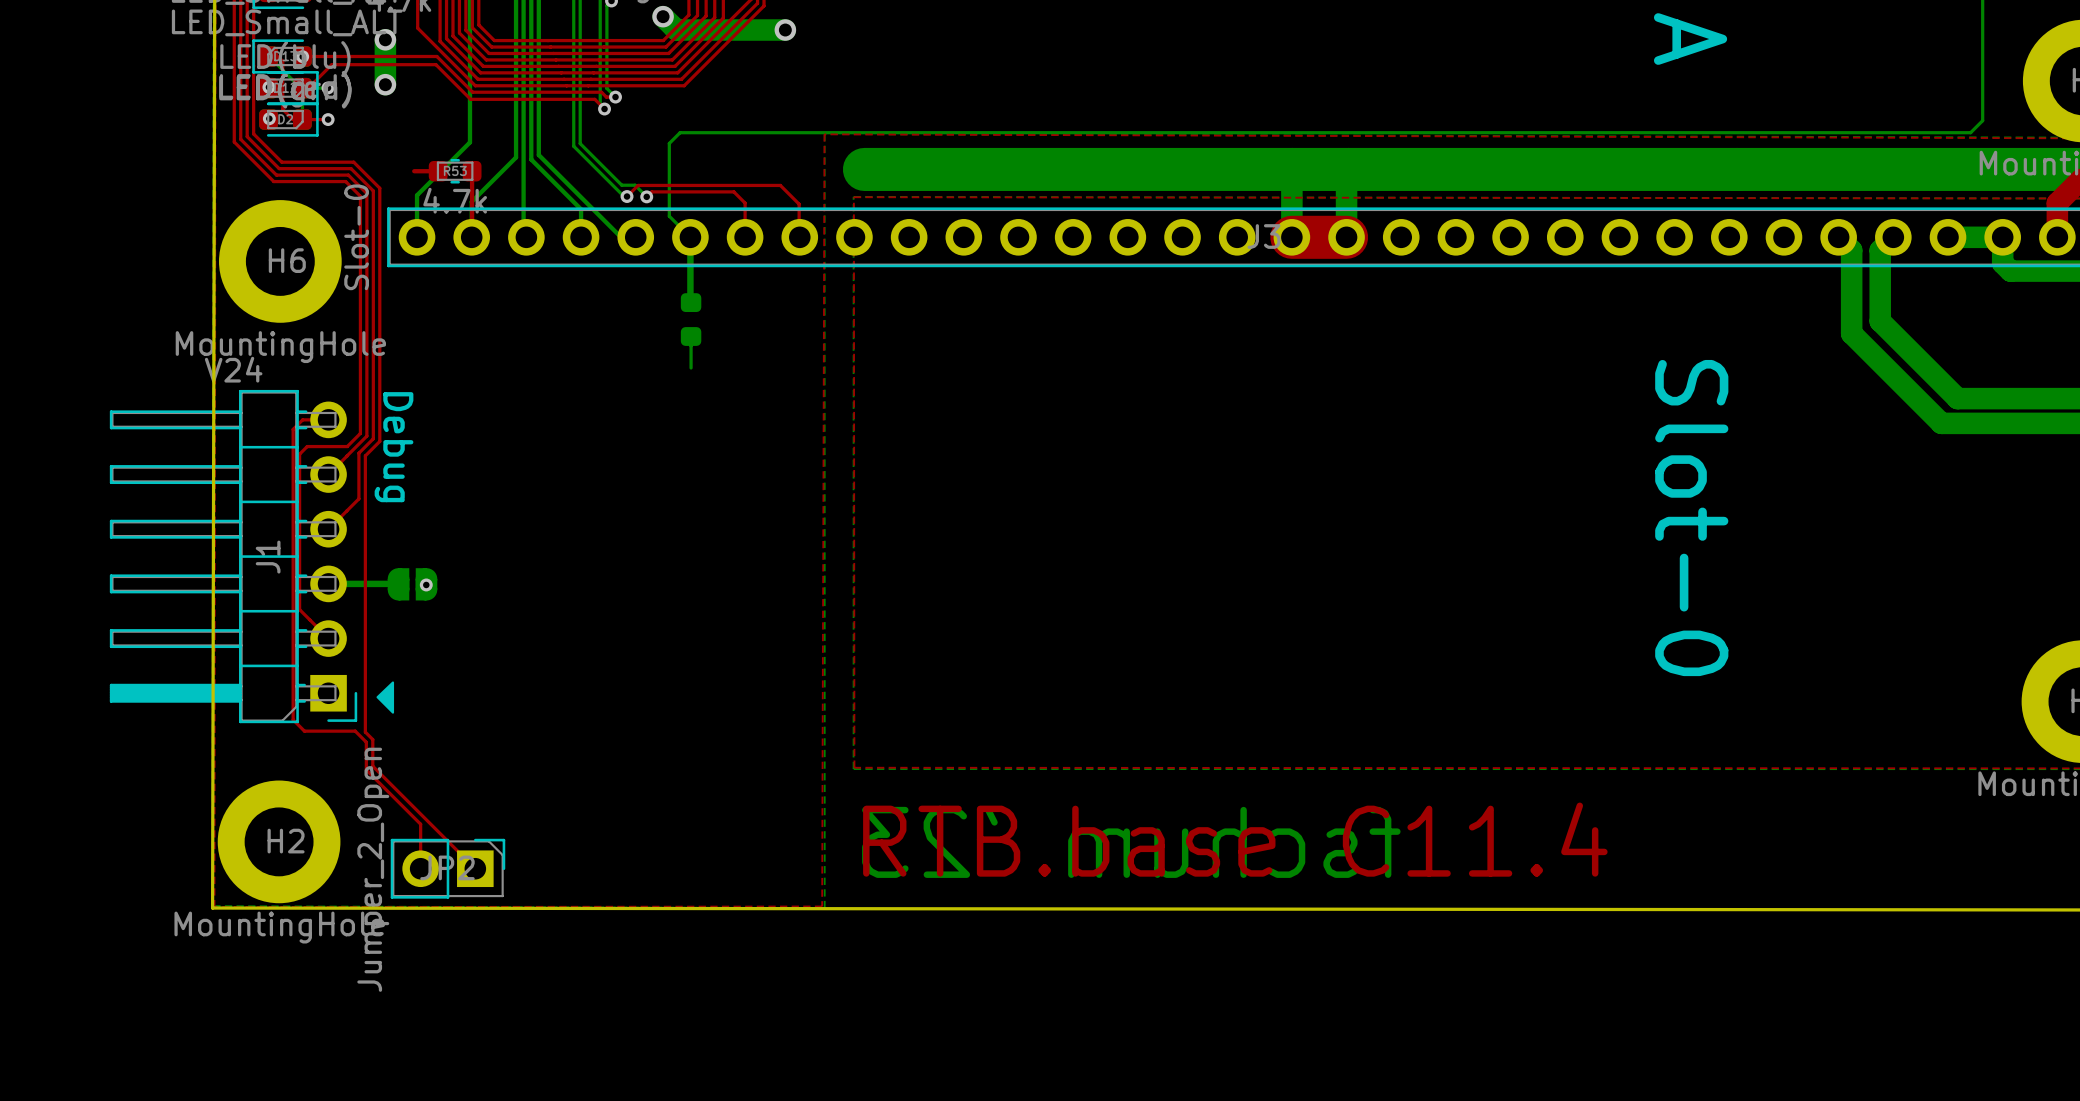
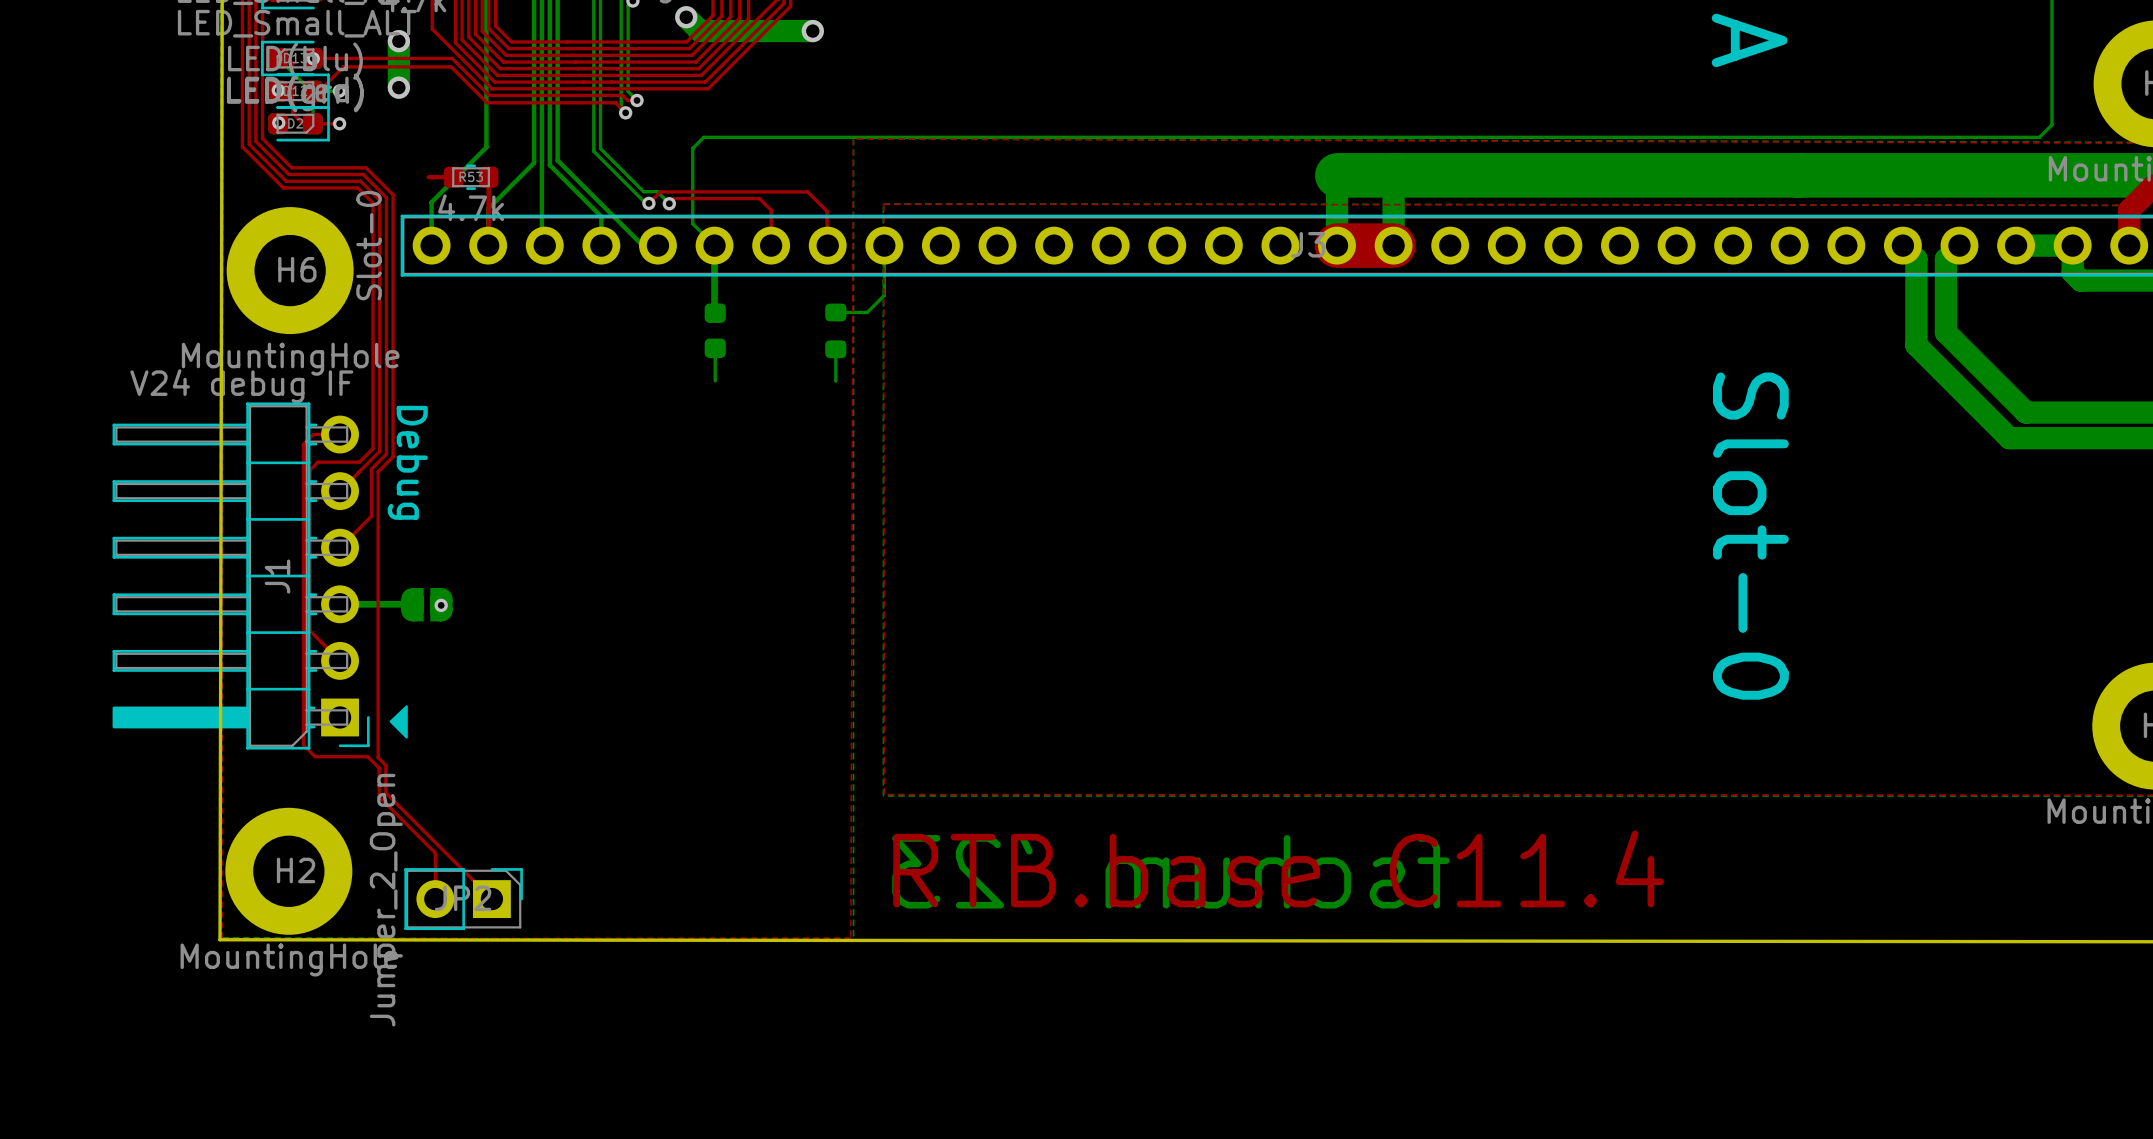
bottom track: (864, 169) (1292, 169) -> none
bottom track: none -> (884, 245) (884, 295) (867, 312) (835, 312)
part: none -> (835, 330)
bottom track: none -> (835, 349) (835, 381)
J1 value: V24 (233, 369) -> V24 debug IF (241, 386)
J1 footprint: [109, 389, 358, 724] -> [112, 402, 370, 750]

